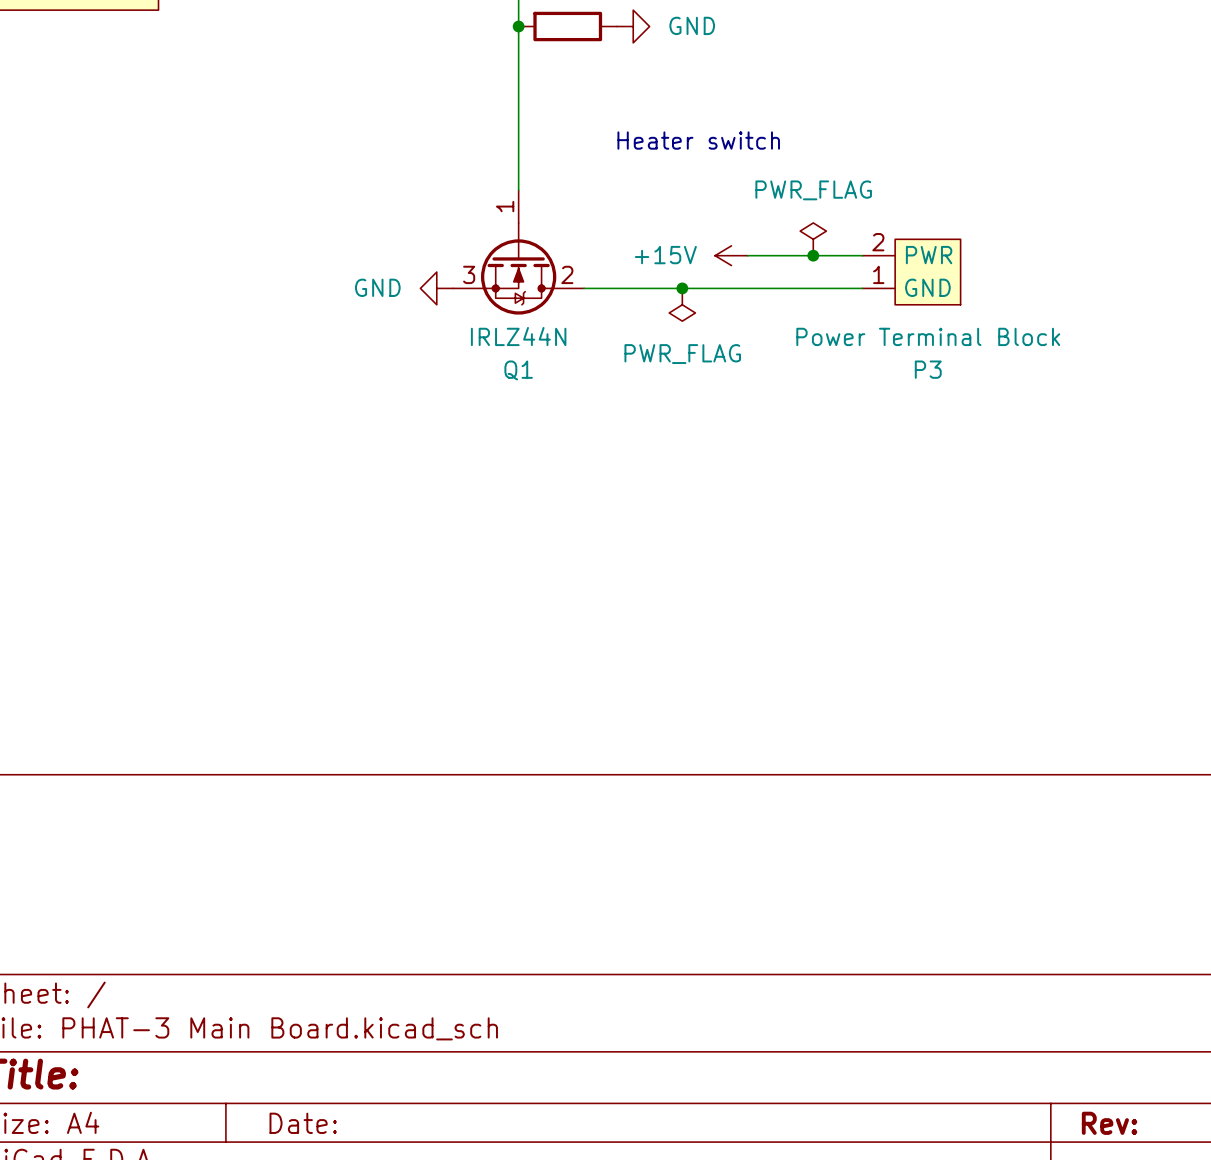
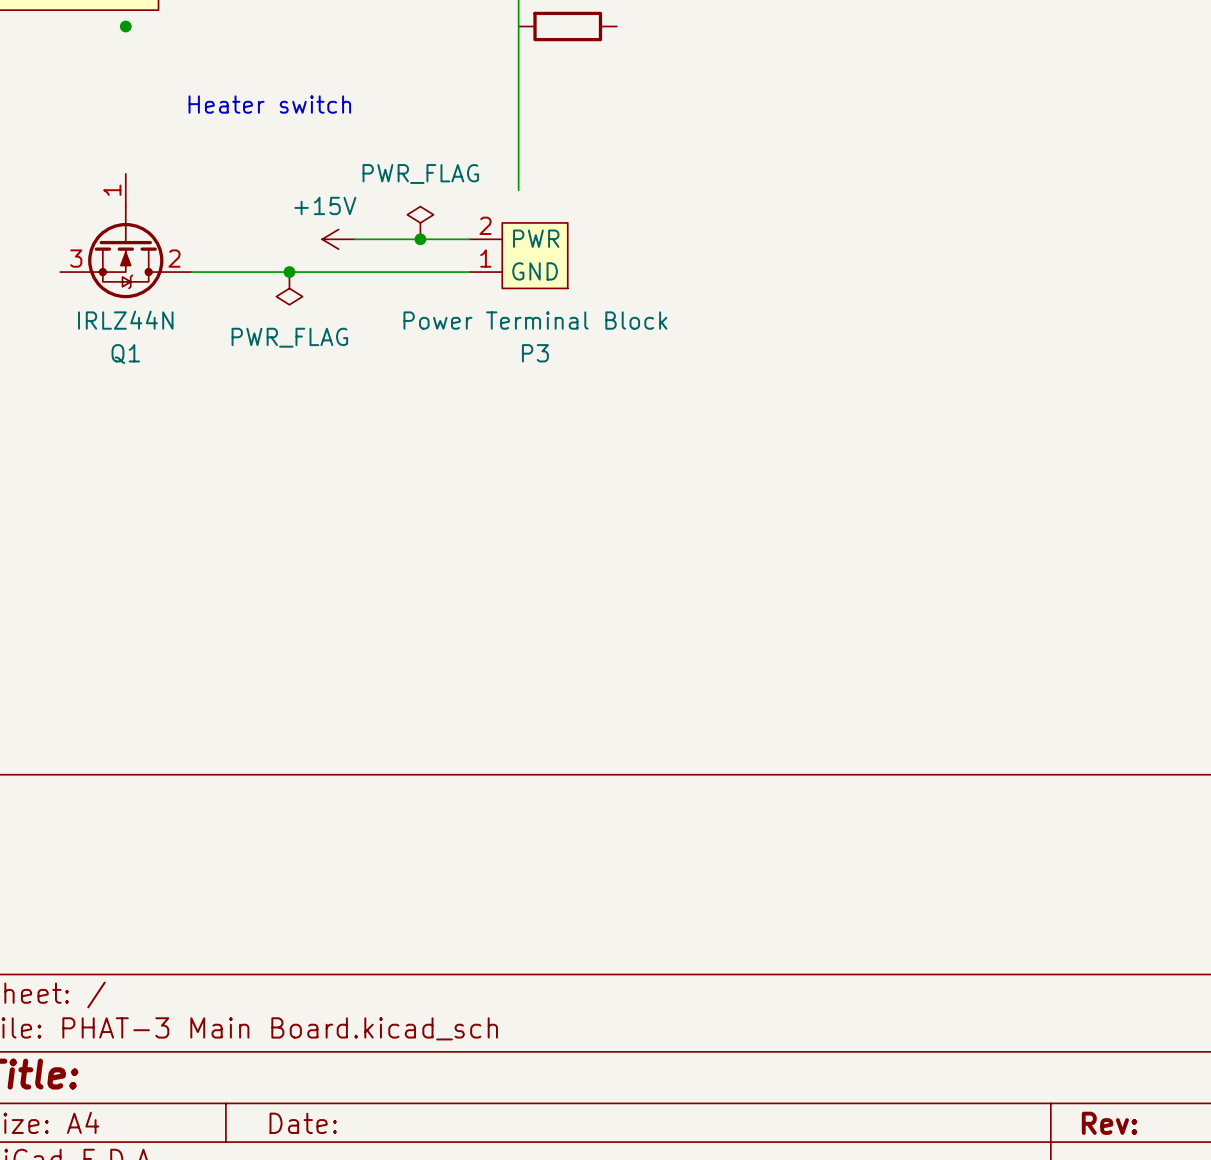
junction: none -> (125, 26)
junction: (518, 26) -> none
power symbol: GND (633, 26) -> none
text: none -> Heater switch (269, 104)
text: Heater switch (698, 140) -> none
power symbol: none -> PWR_FLAG (420, 222)
power symbol: none -> +15V (338, 239)
wire: none -> (354, 239) (469, 239)
junction: none -> (420, 239)
power symbol: PWR_FLAG (813, 239) -> none
Q1 position: (518, 252) -> (125, 236)
power symbol: +15V (731, 255) -> none
wire: (747, 255) (862, 255) -> none
junction: (813, 255) -> none
wire: none -> (191, 272) (469, 272)
junction: none -> (289, 272)
P3 position: (911, 272) -> (518, 255)
power symbol: none -> PWR_FLAG (289, 288)
power symbol: GND (436, 288) -> none
wire: (584, 288) (862, 288) -> none
junction: (682, 288) -> none
power symbol: PWR_FLAG (682, 304) -> none

